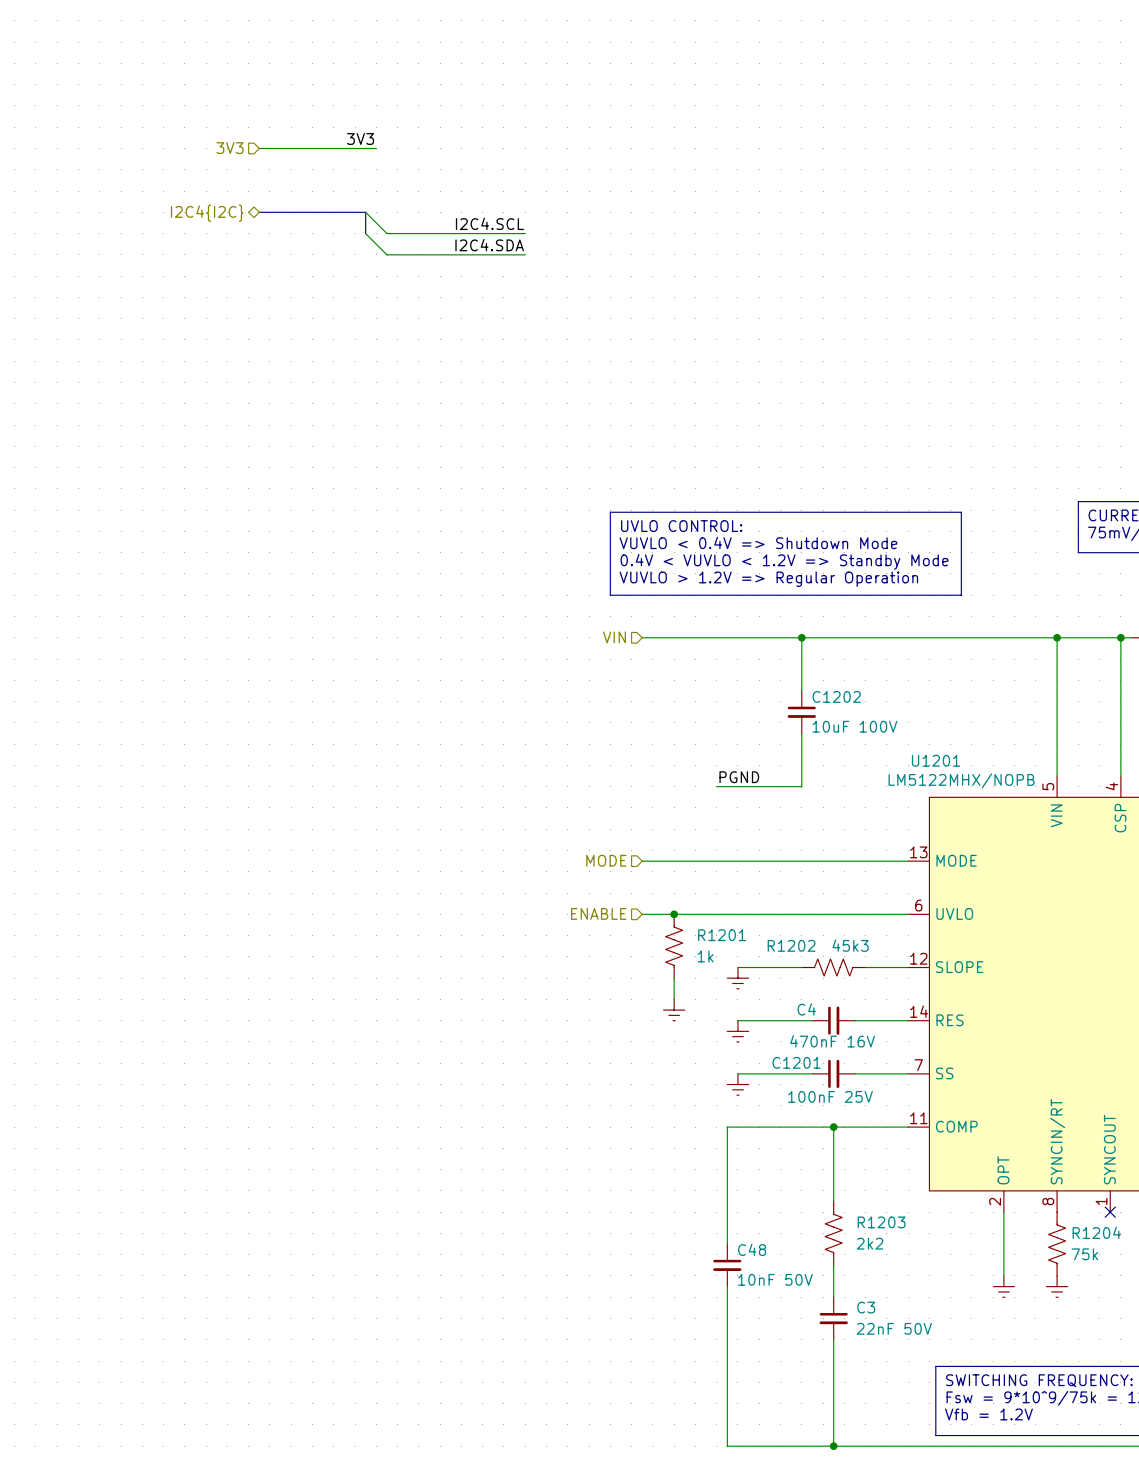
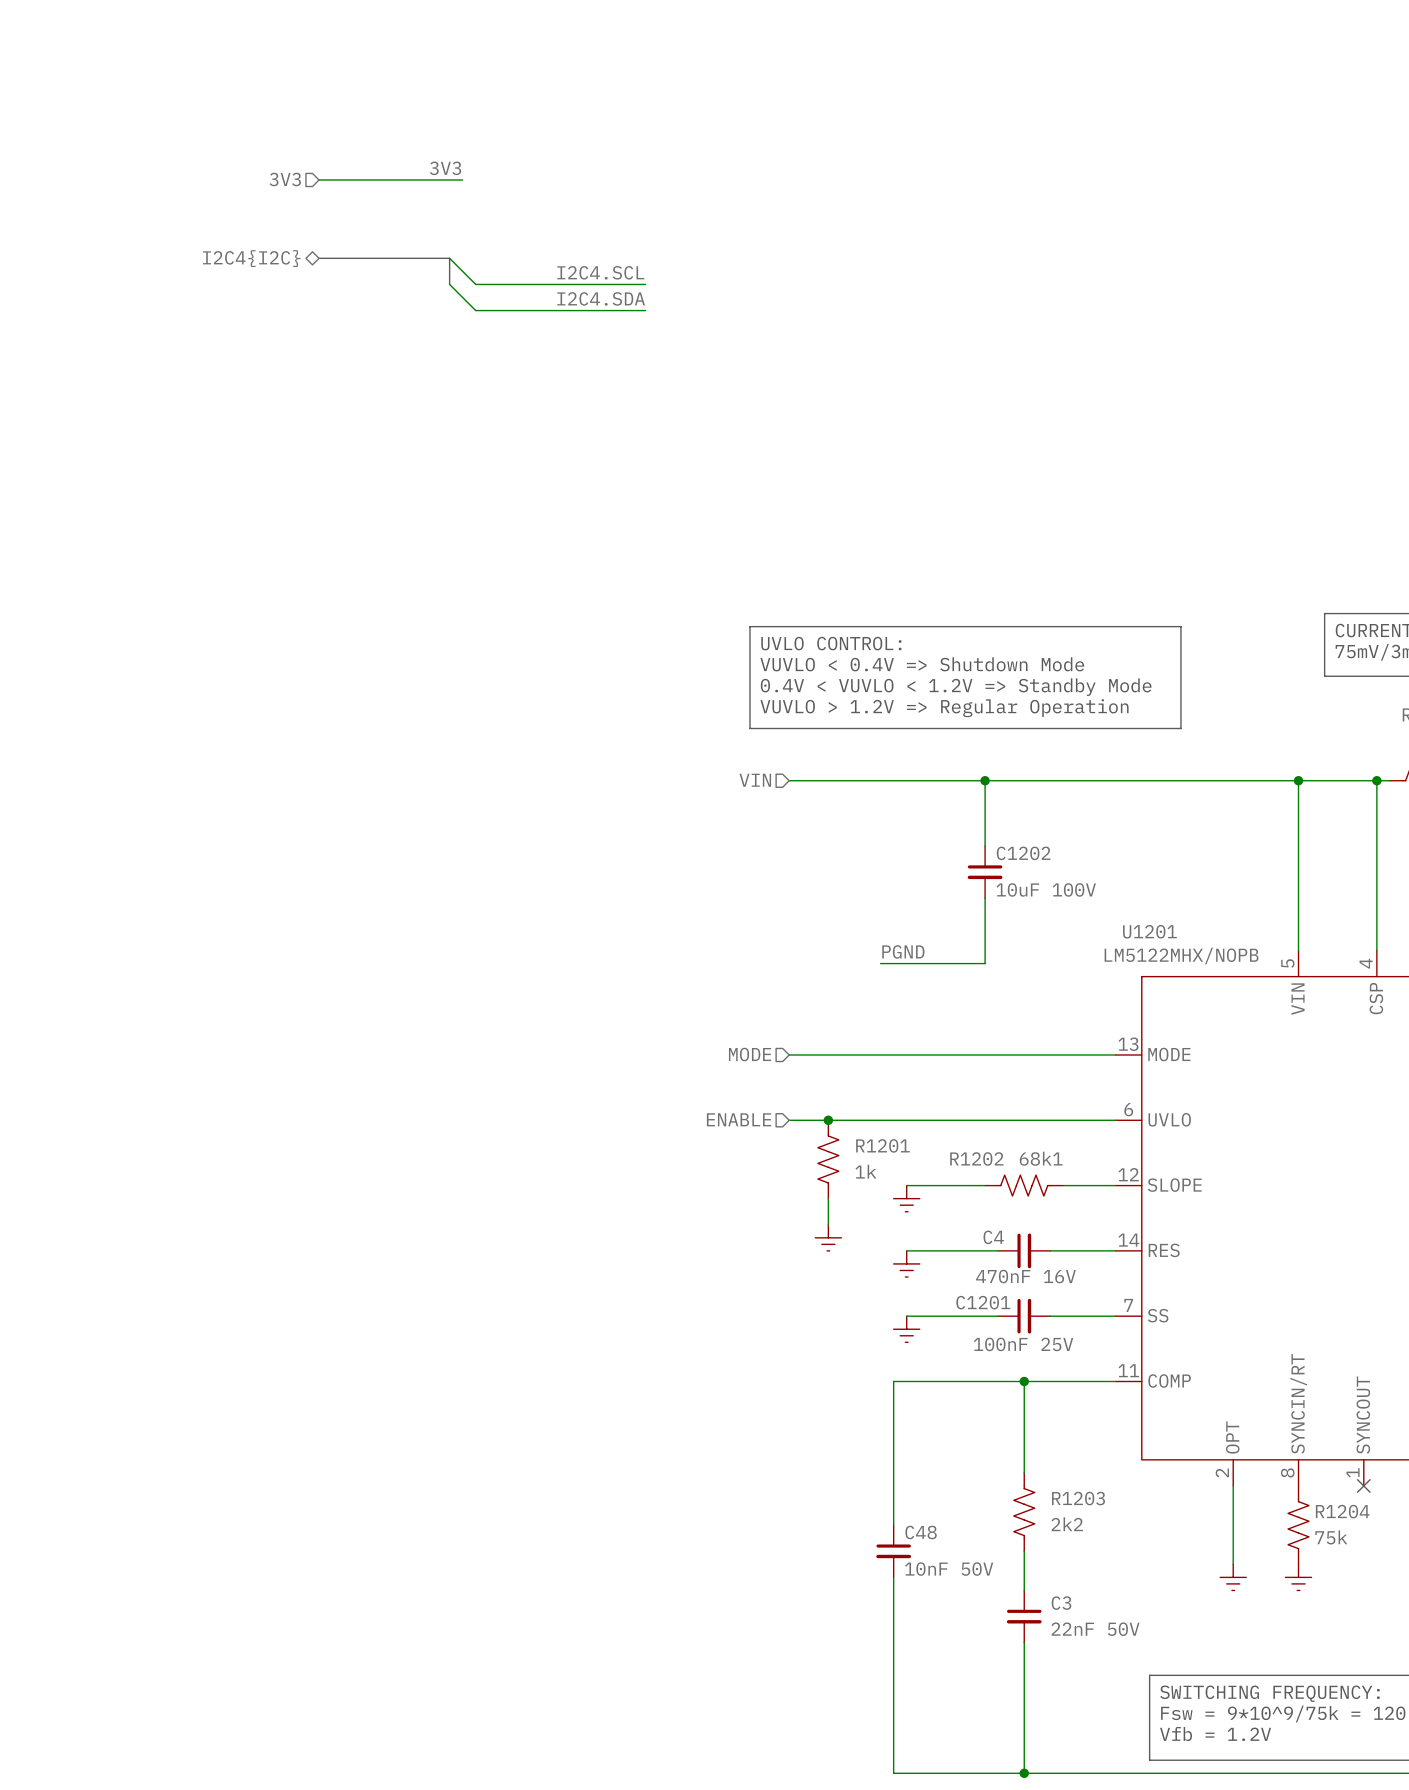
R1202 value: 45k3 (850, 945) -> 68k1 (1041, 1158)

